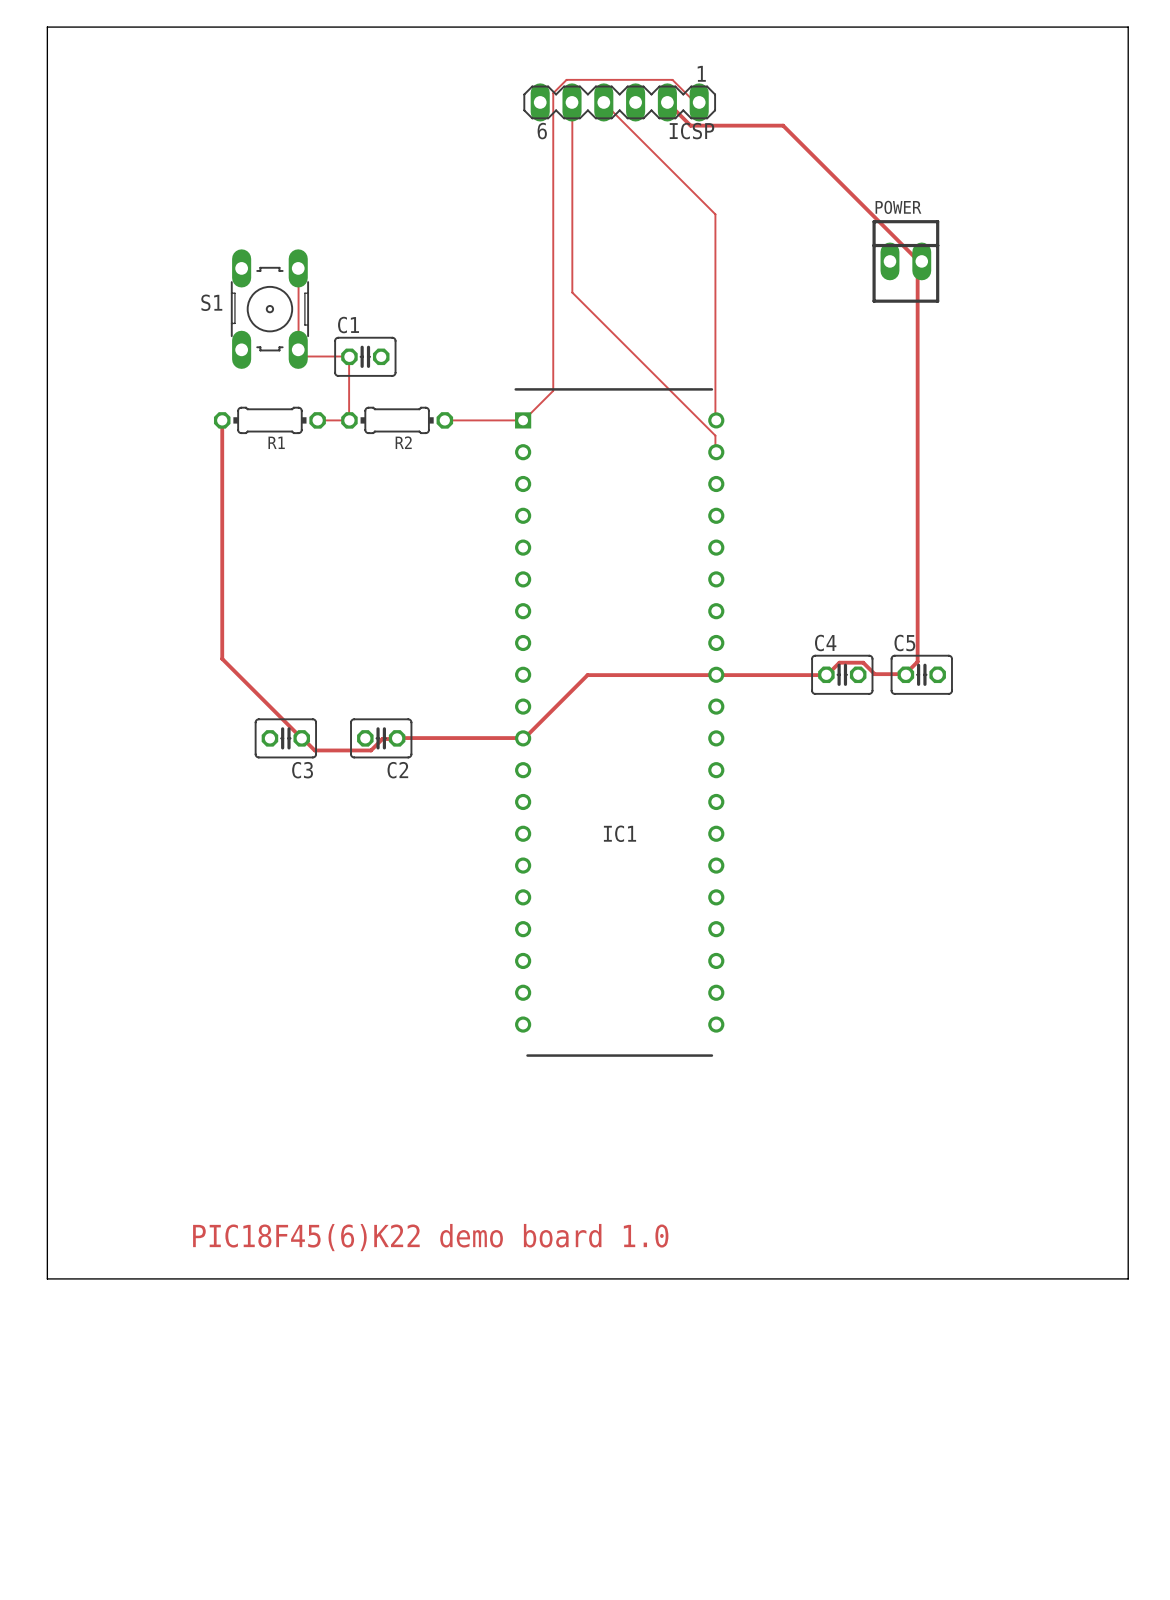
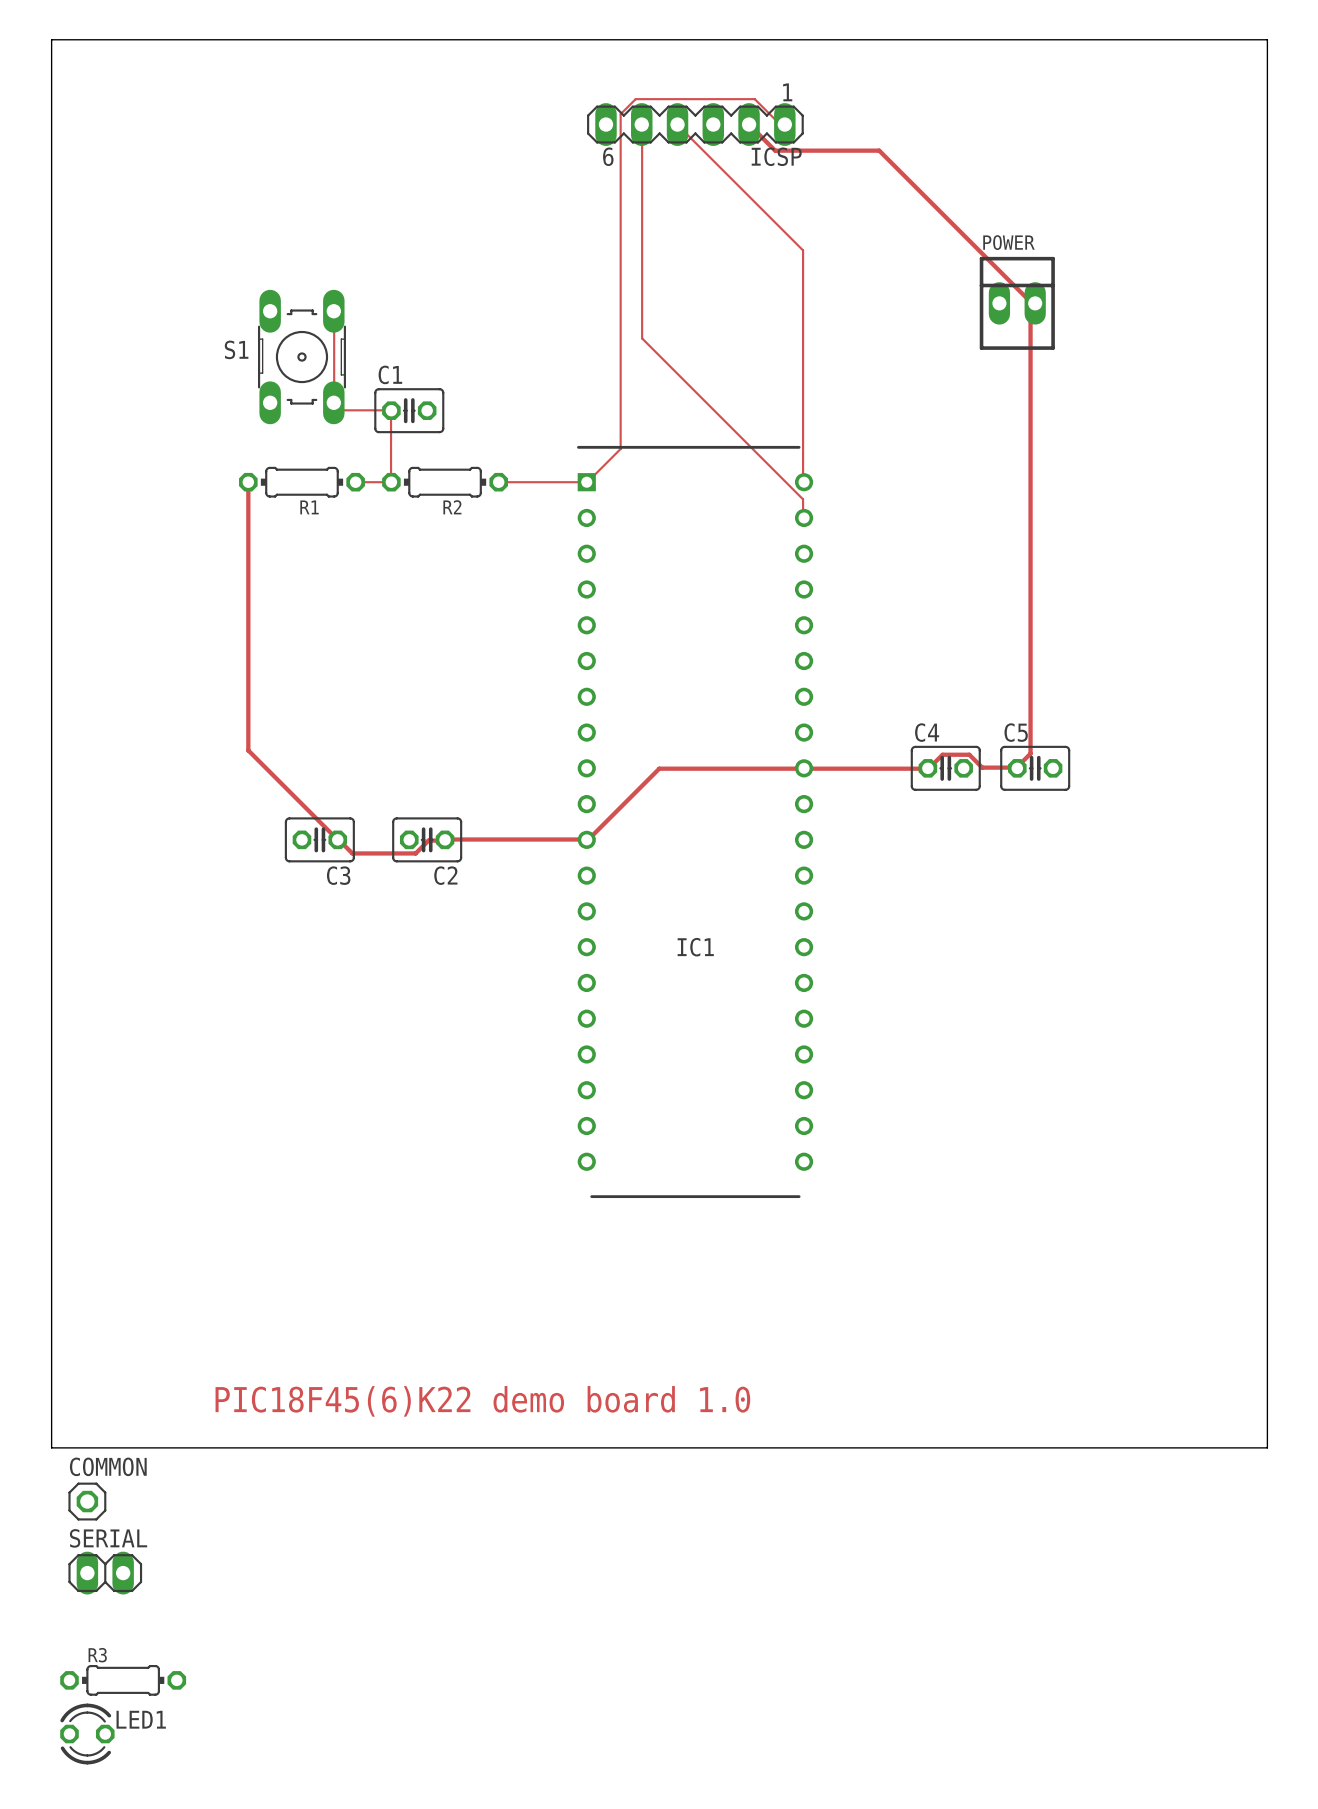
COMMON: none -> (87, 1501)
SERIAL: none -> (105, 1573)
R3: none -> (123, 1680)
LED1: none -> (87, 1734)

